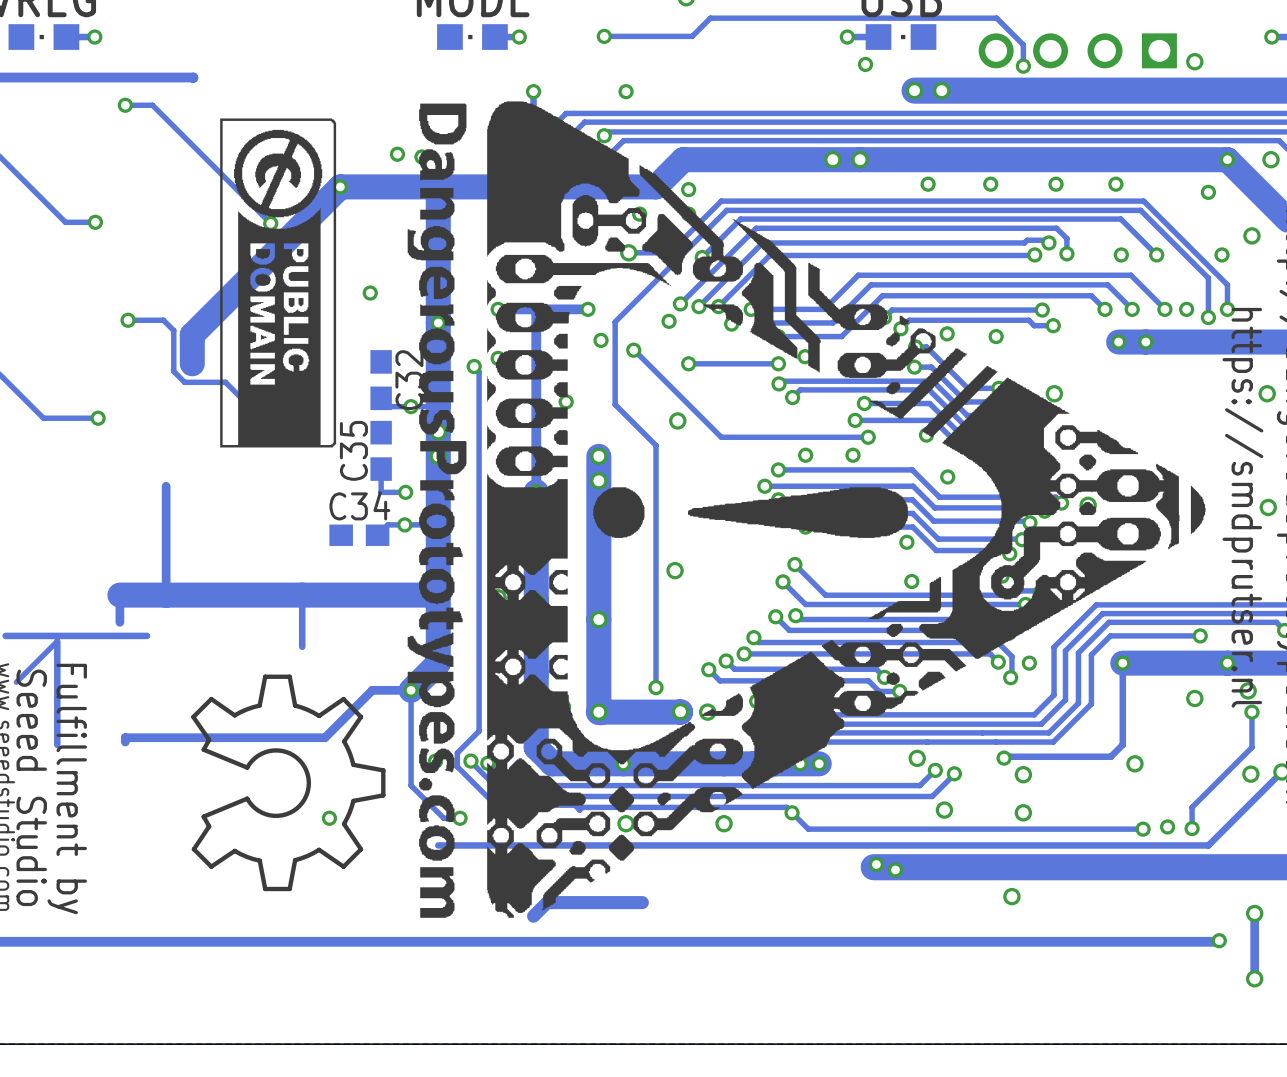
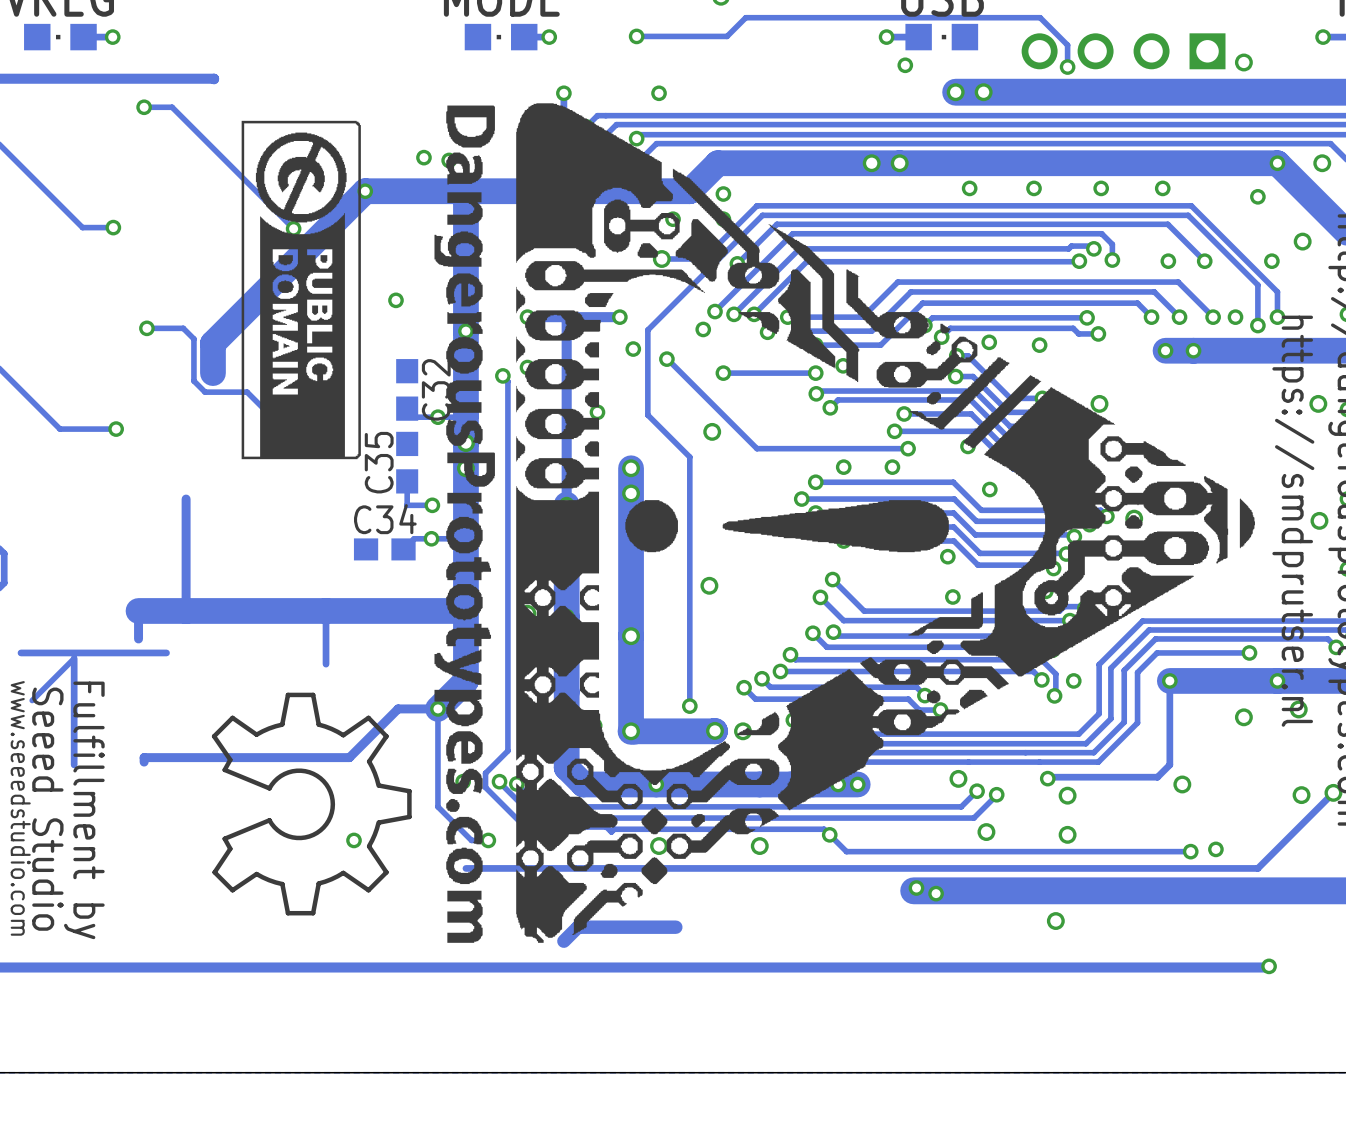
track: (1251, 712) (1251, 747) (1192, 807) (1192, 828) -> none
via: (1251, 712) -> none
via: (1192, 828) -> none
track: (1254, 913) (1254, 978) -> none
via: (1254, 913) -> none
via: (1254, 978) -> none

